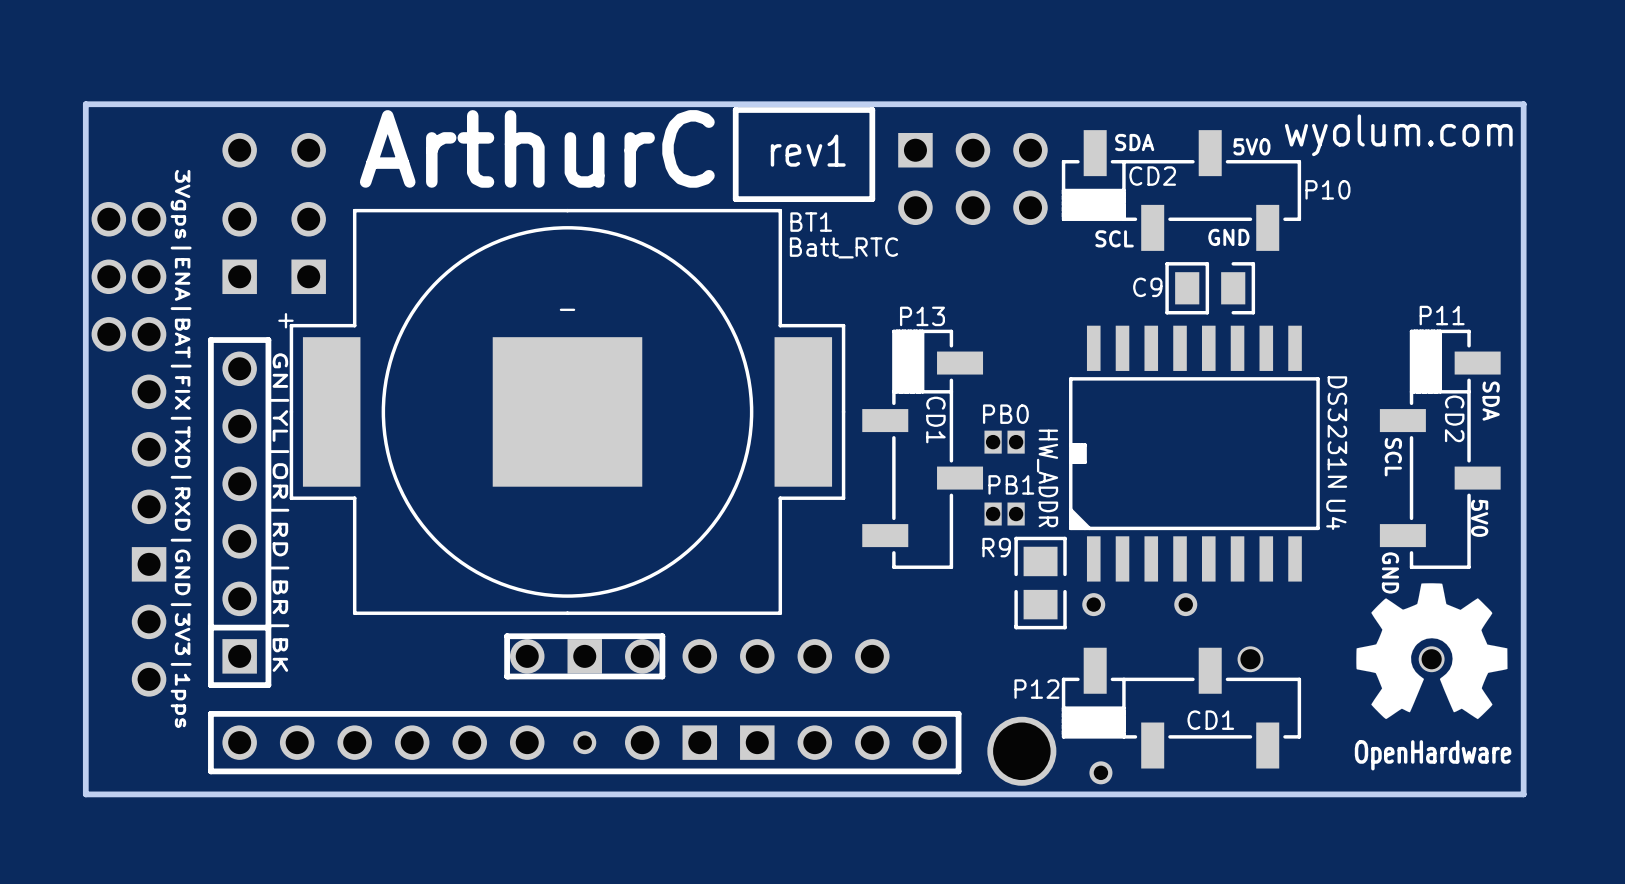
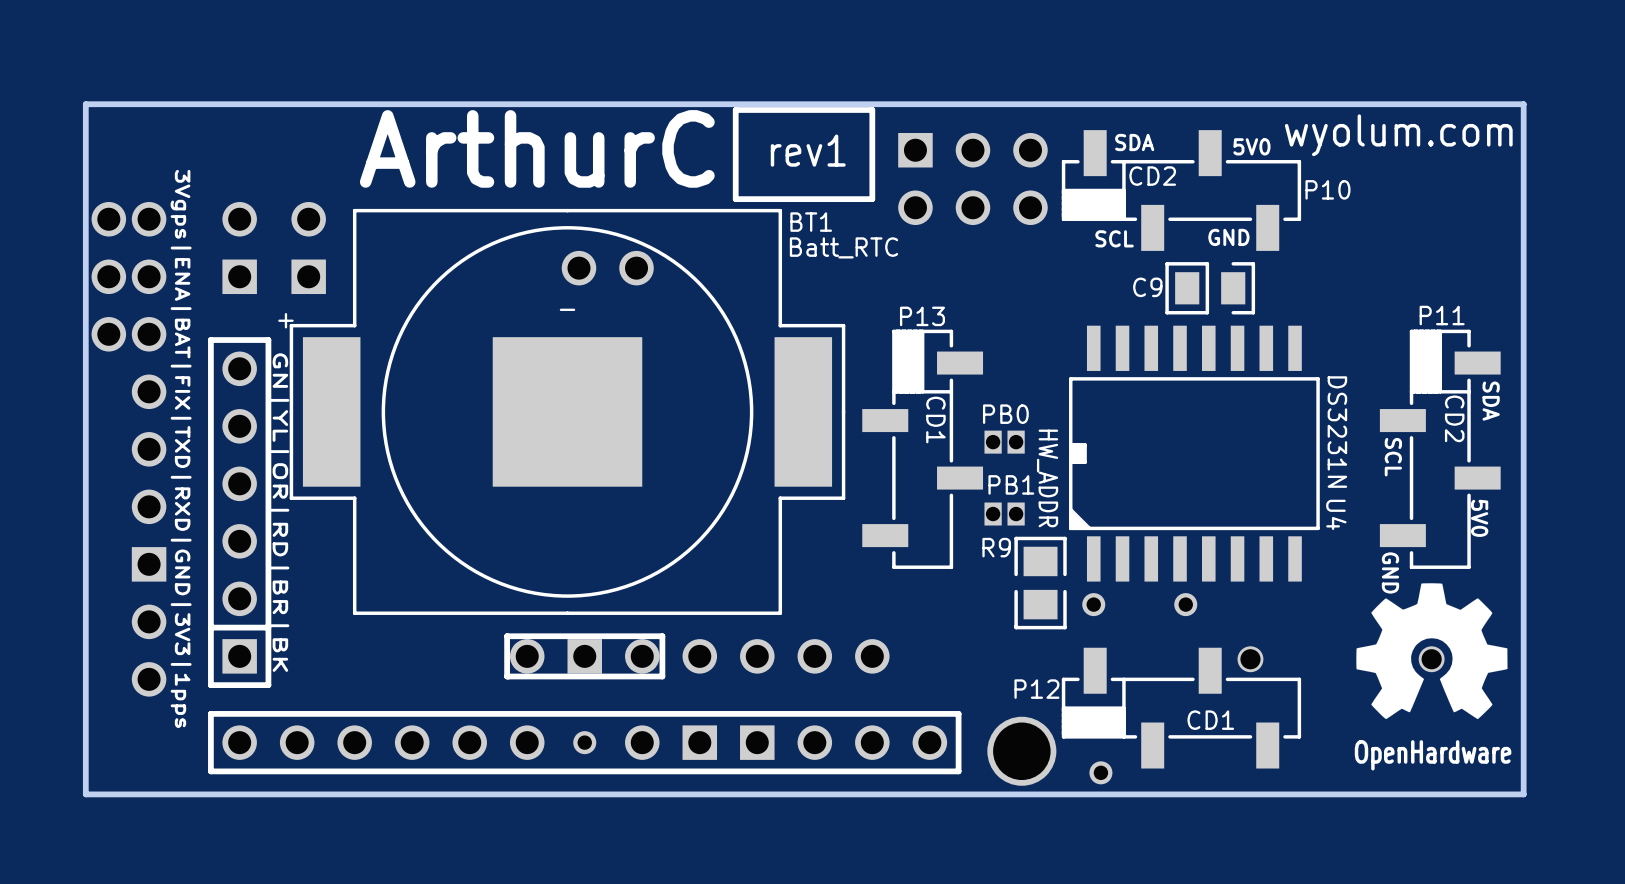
part: (239, 150) -> none
part: (308, 150) -> none
part: none -> (579, 268)
part: none -> (636, 268)

